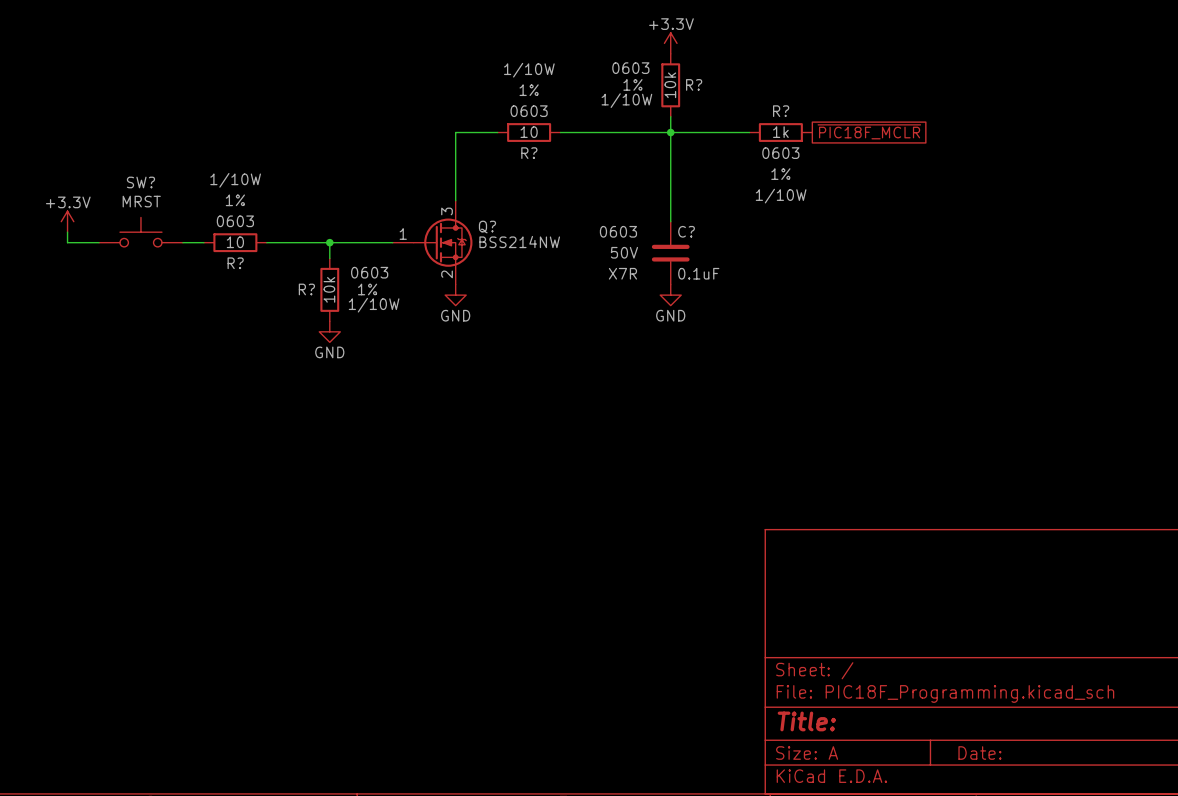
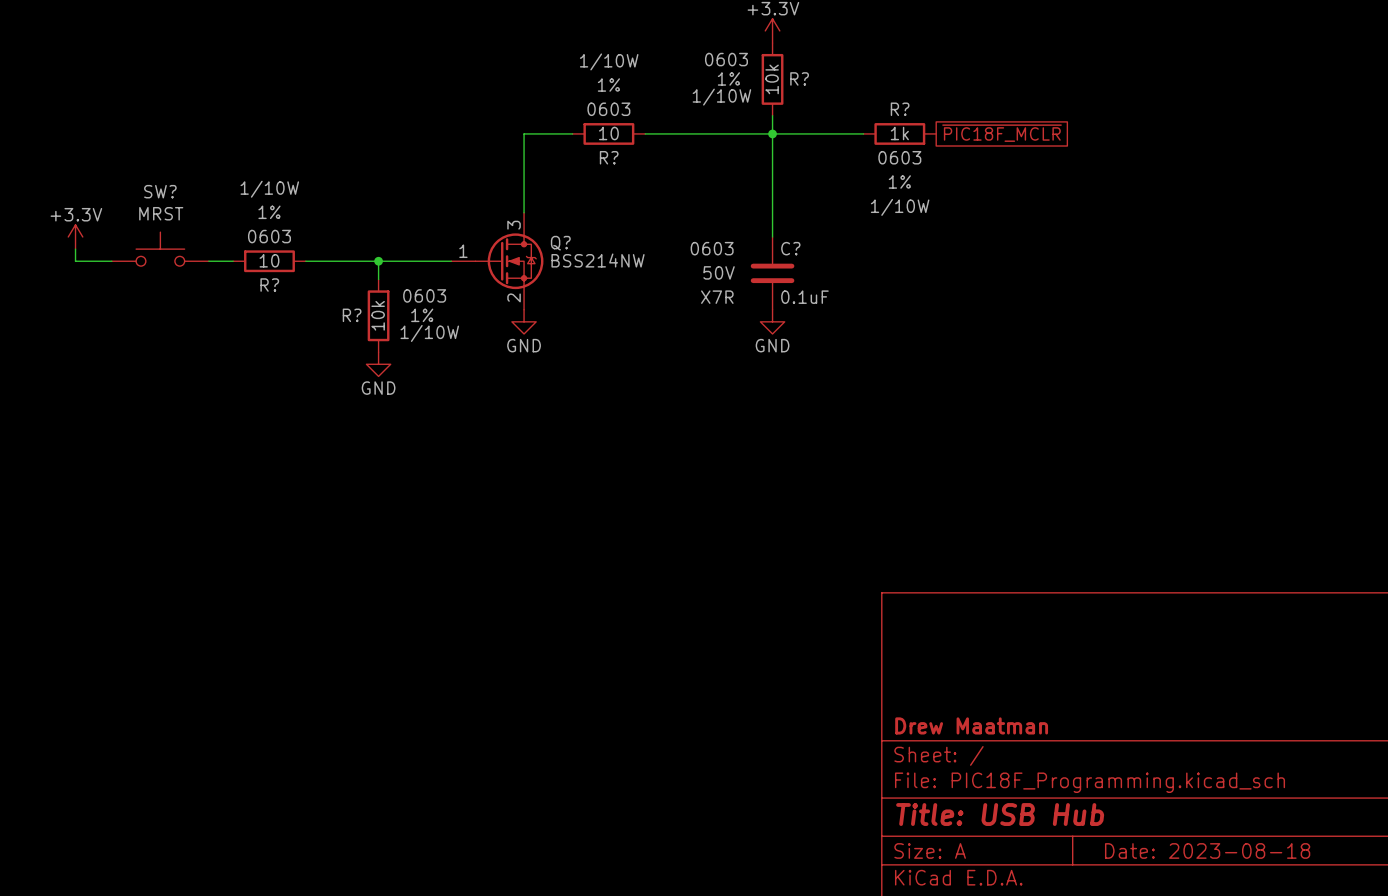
title block: none -> Drew Maatman (971, 725)
title block: Title: (806, 721) -> Title: USB Hub (1000, 814)
title block: Date: (979, 753) -> Date: 2023-08-18 (1207, 850)

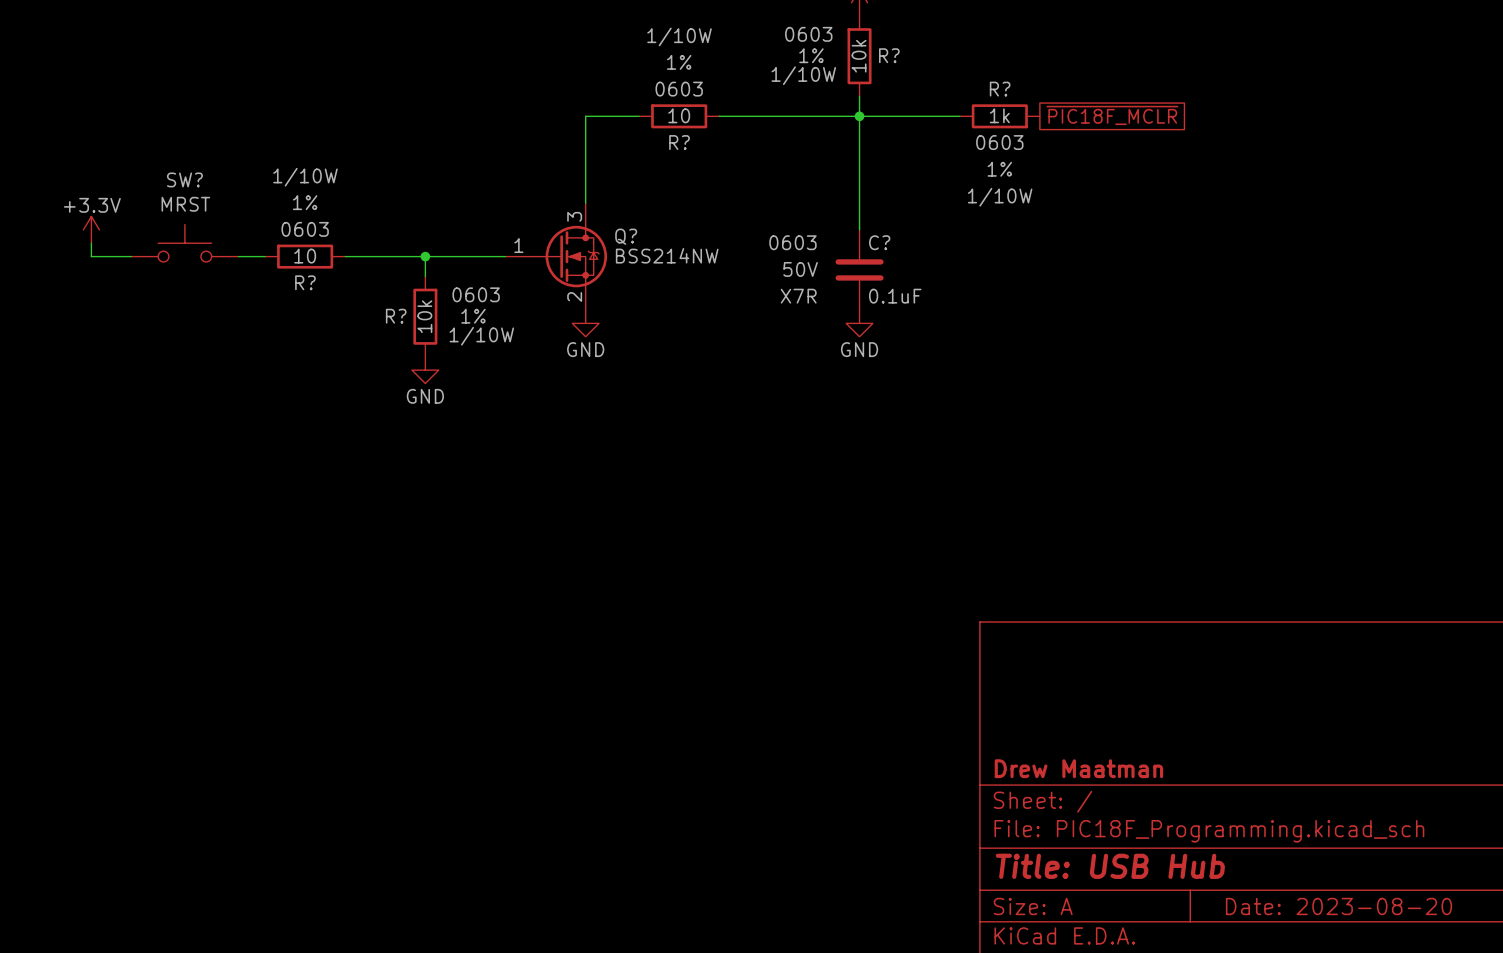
title block: Date: 2023-08-18 (1207, 850) -> Date: 2023-08-20 (1339, 906)

